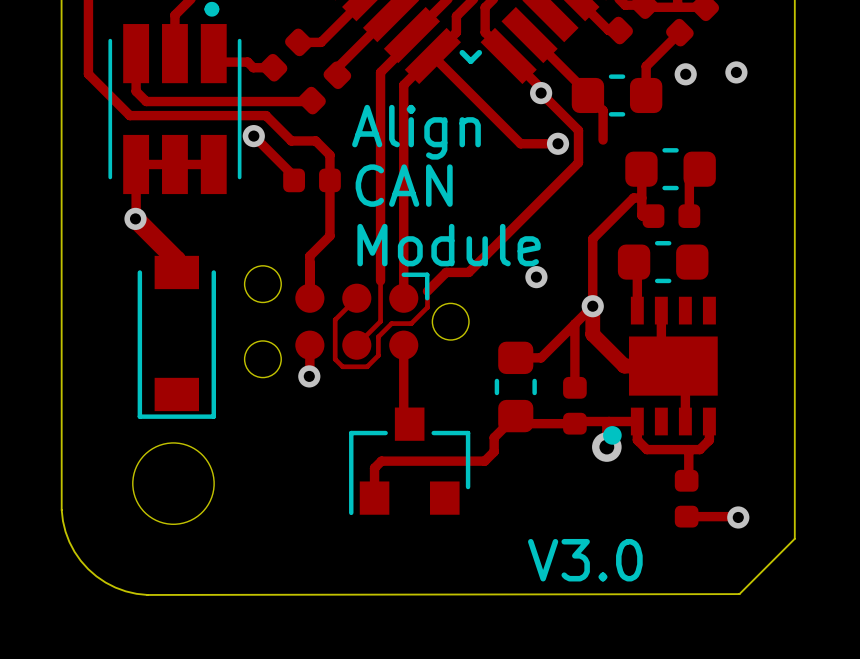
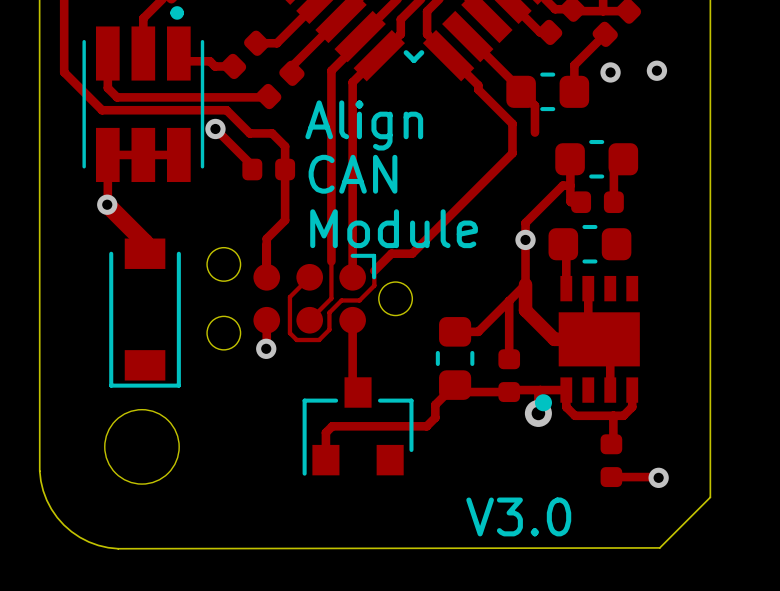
track: (432, 55) (520, 143) (558, 143) -> none
via: (541, 93) -> none
via: (558, 143) -> none
via: none -> (525, 239)
via: (536, 277) -> none
via: (592, 306) -> none

